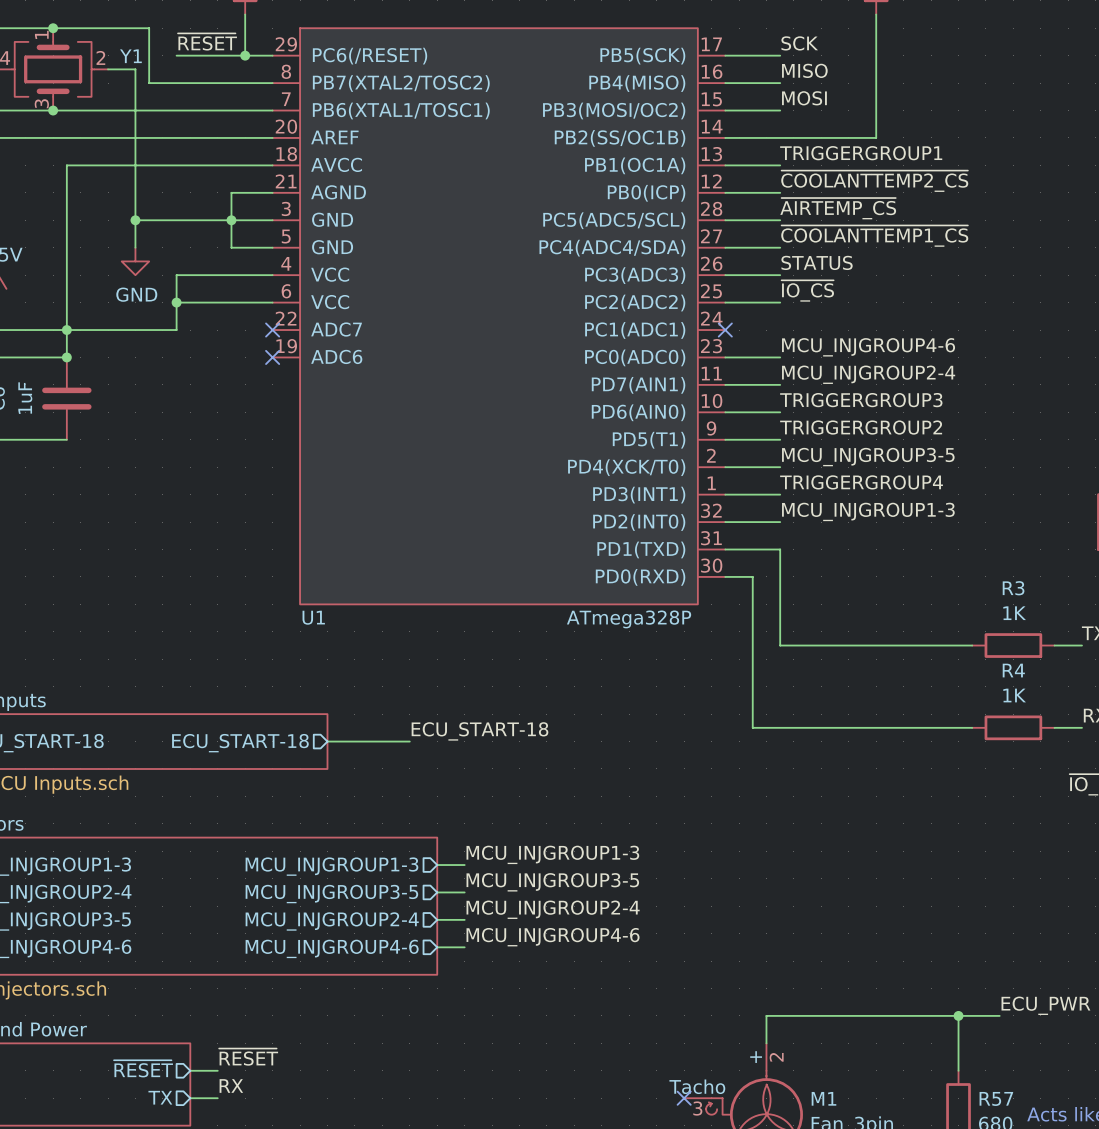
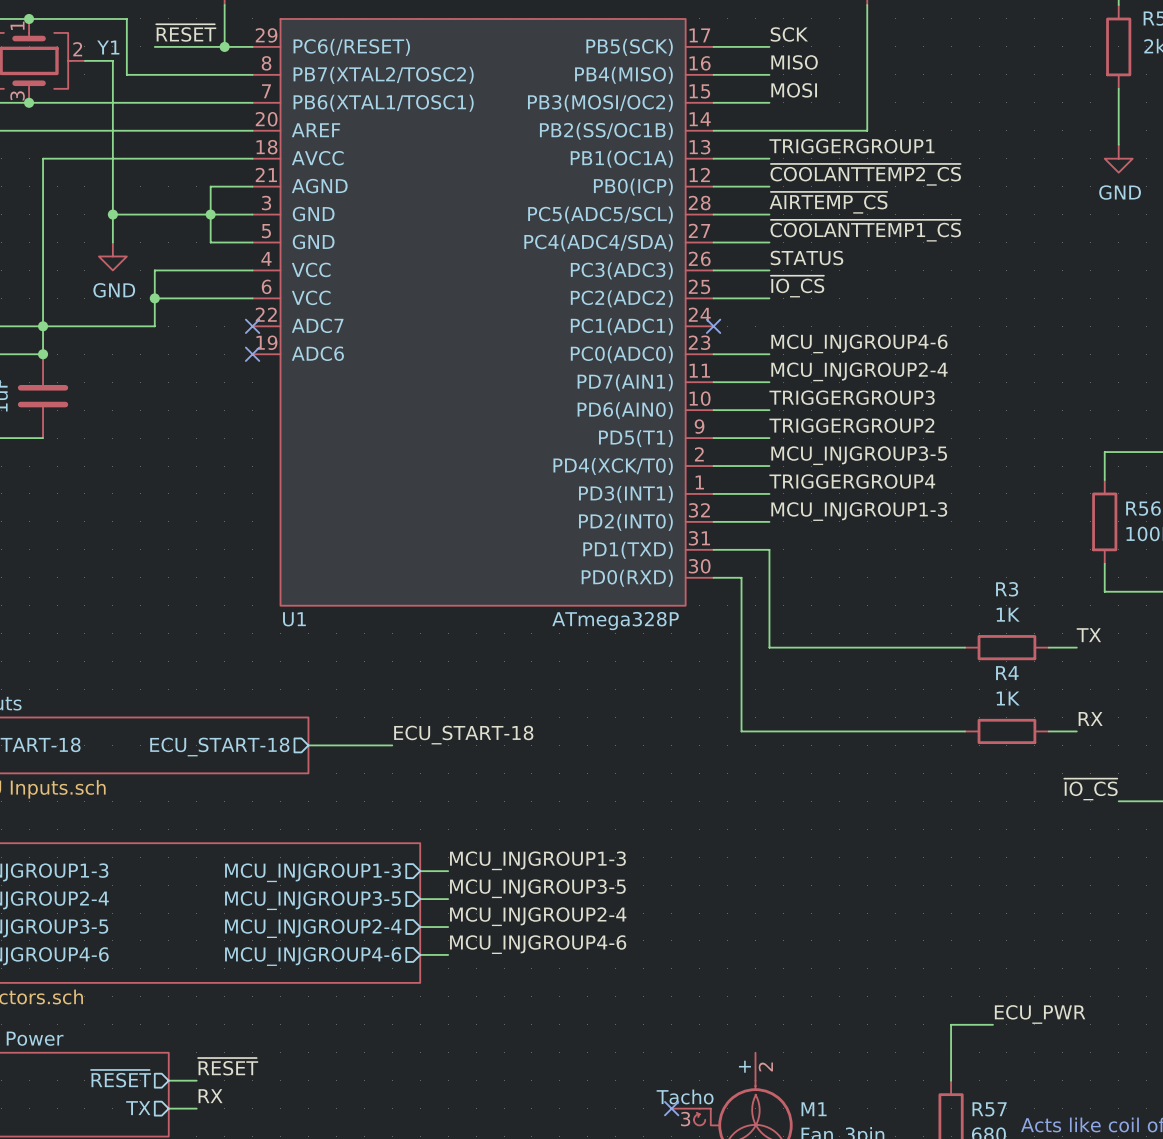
wire: (958, 1015) (766, 1015) (766, 1043) -> none
junction: (958, 1015) -> none

